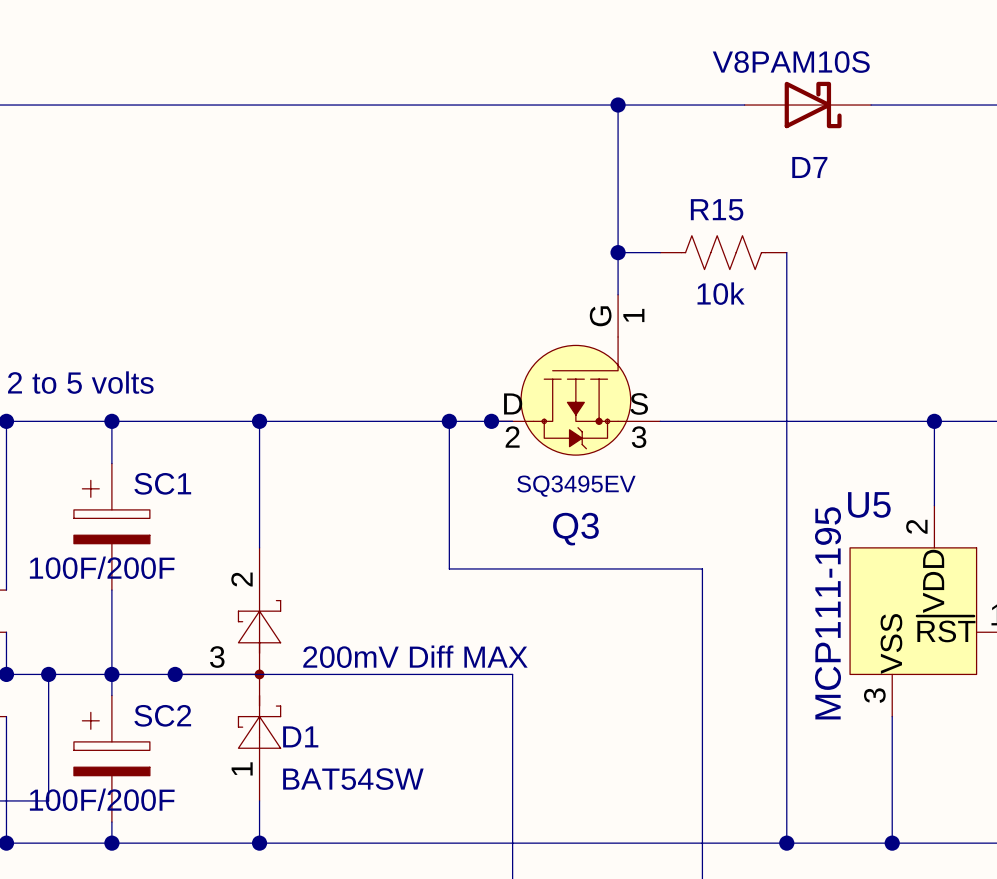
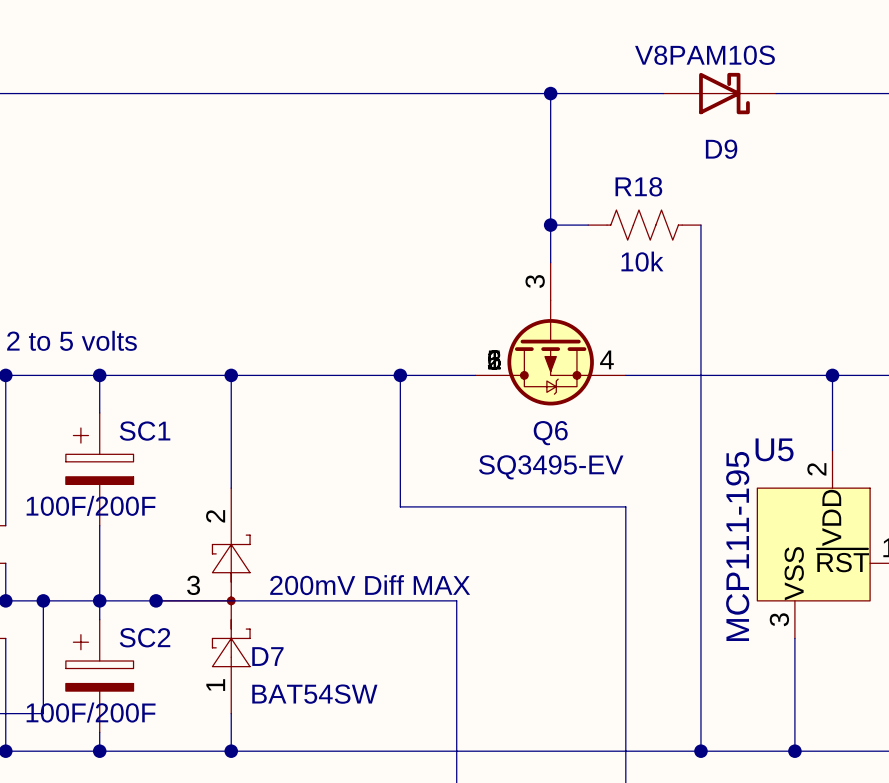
D7 name: D7 (809, 167) -> D9 (721, 149)
R15 name: R15 (717, 209) -> R18 (638, 186)
Q3: SQ3495EV (575, 374) -> none
Q6: none -> SQ3495-EV (550, 334)
junction: (491, 421) -> none
D1 name: D1 (300, 736) -> D7 (267, 656)

